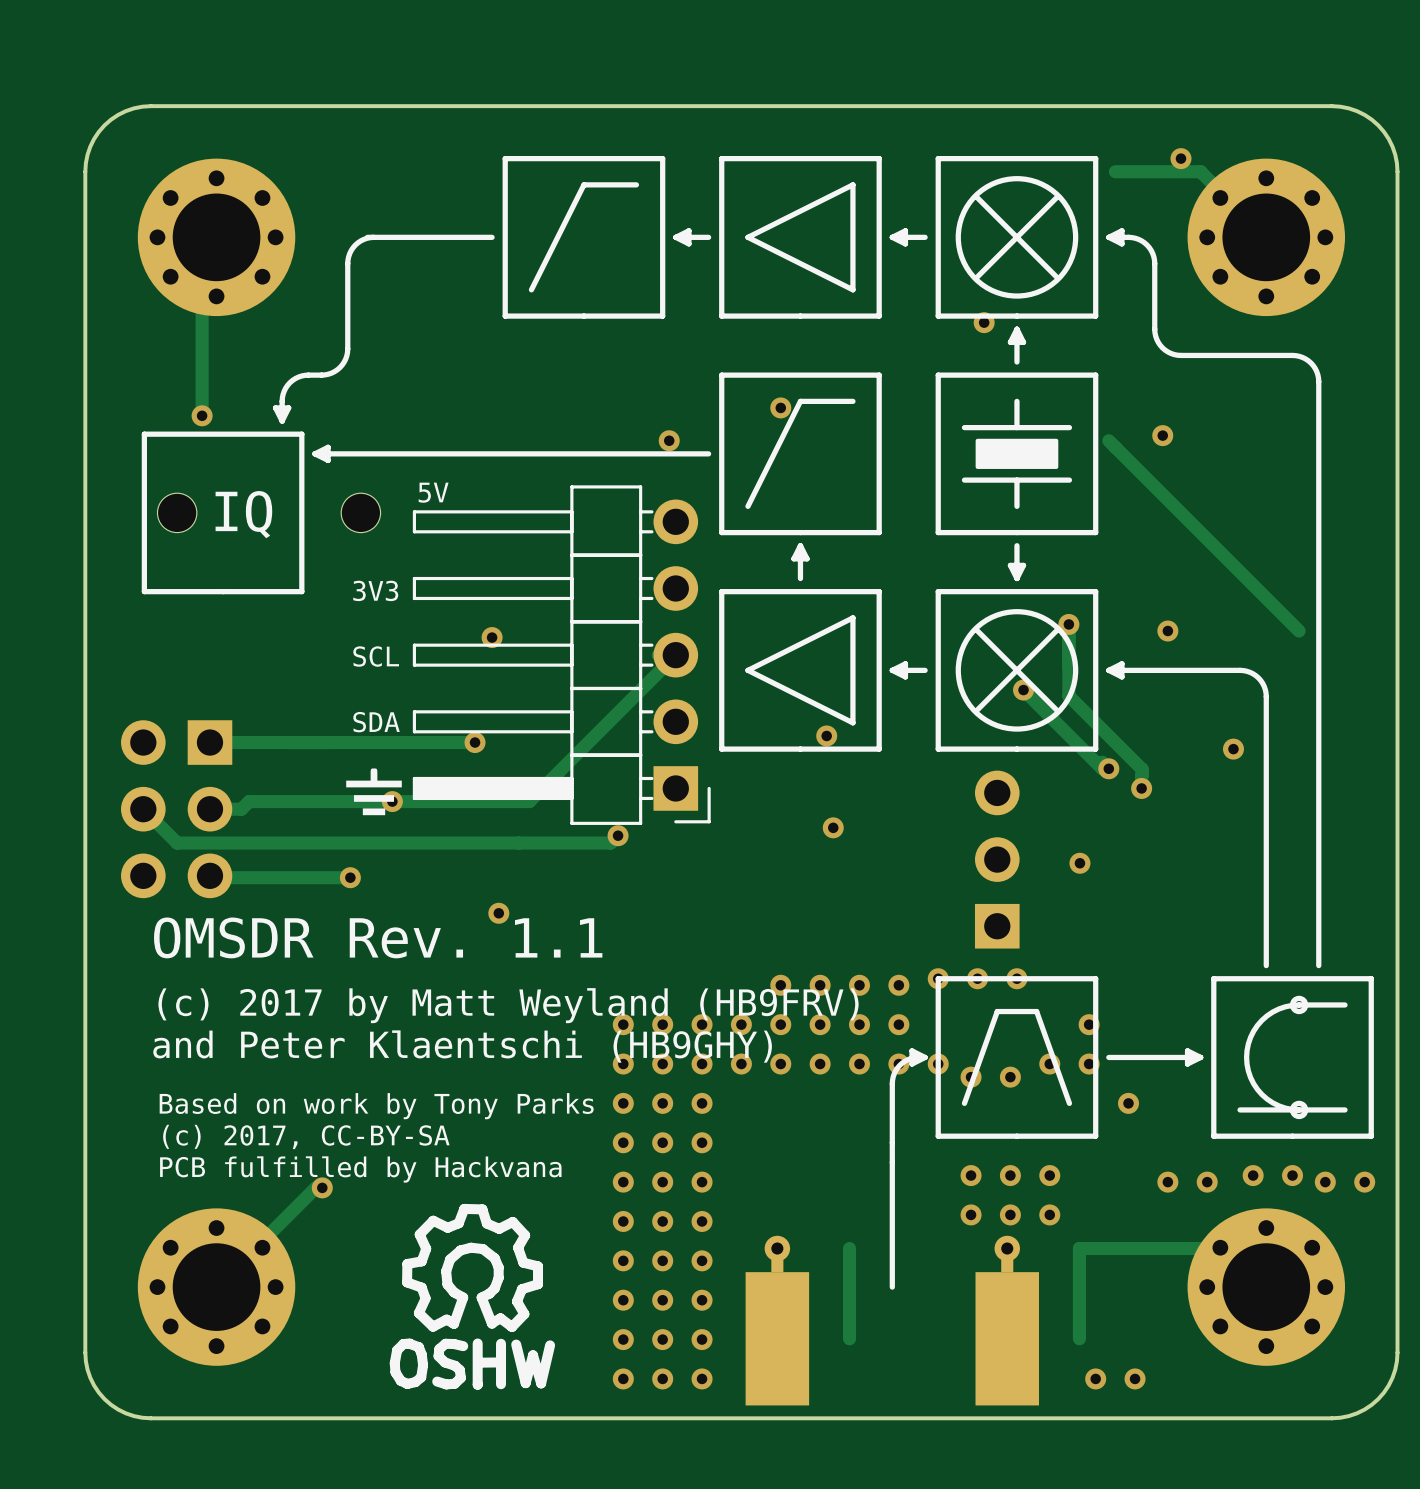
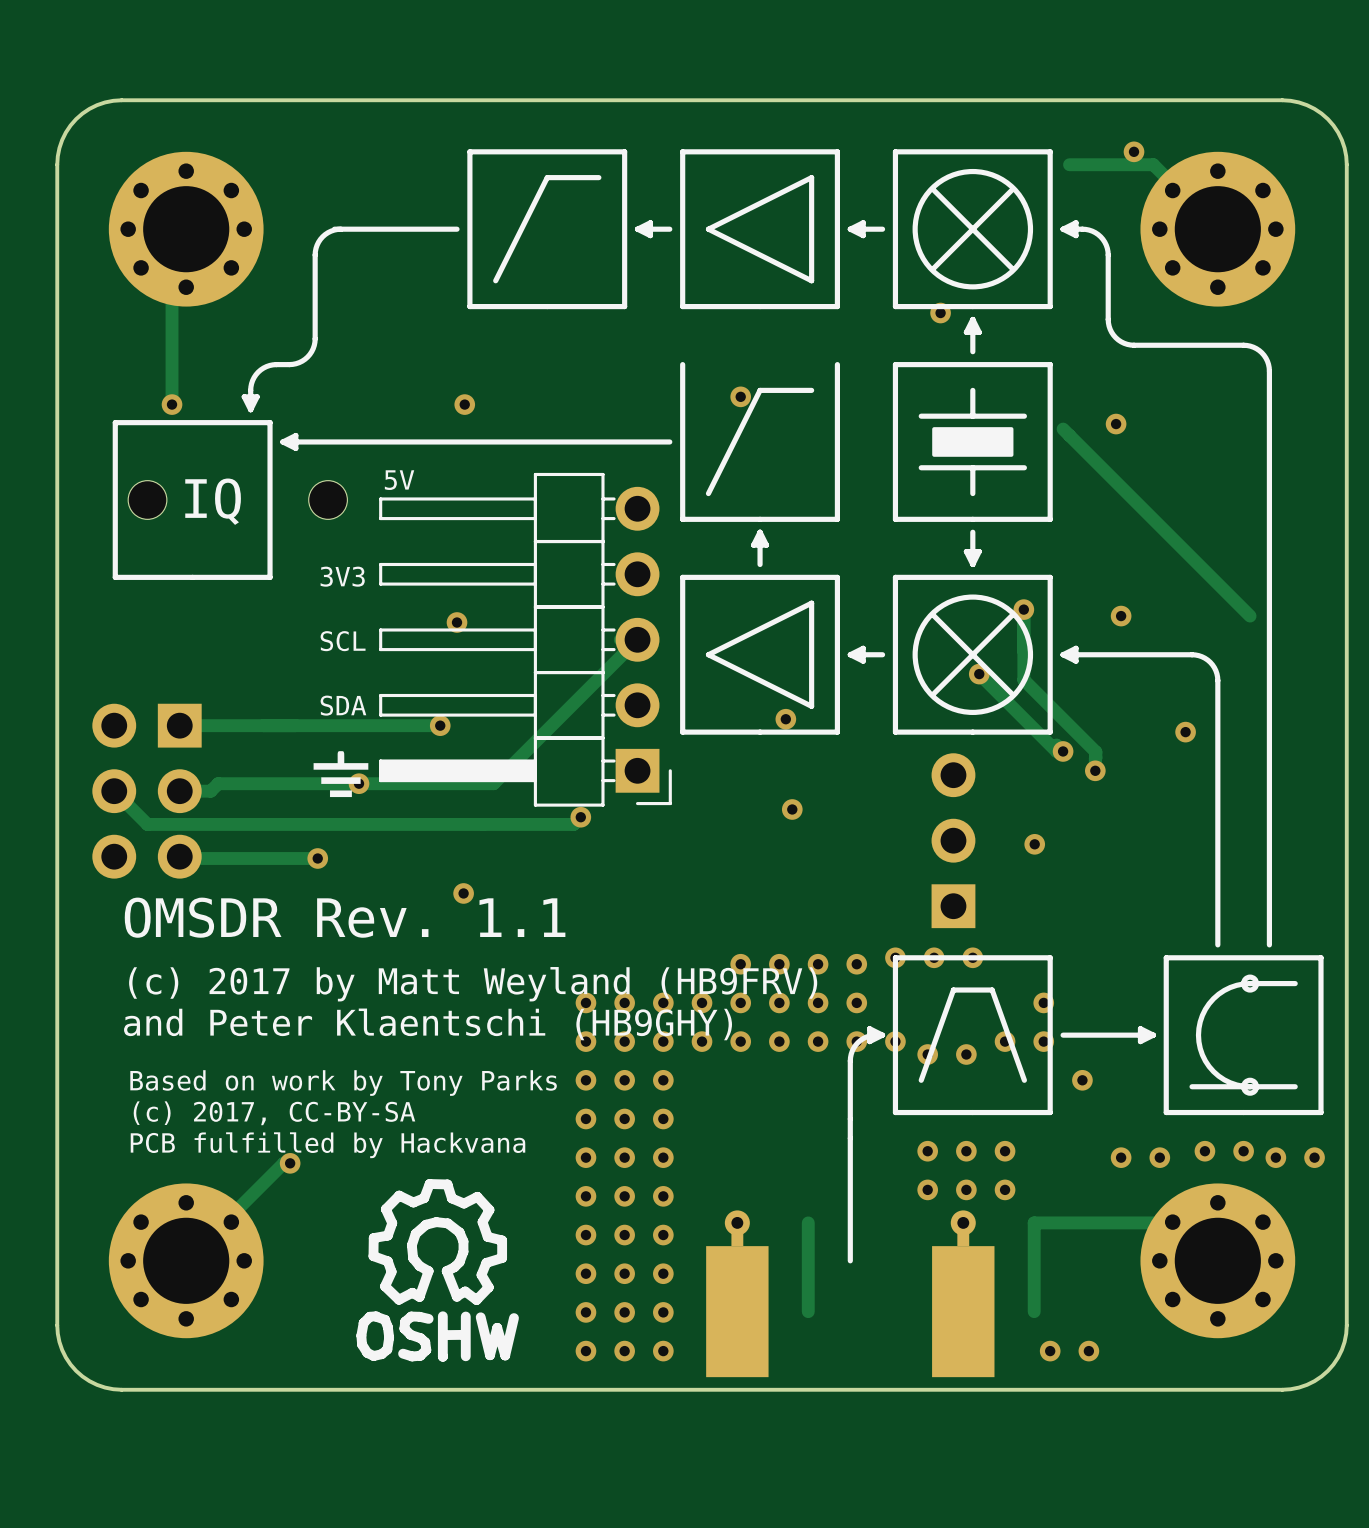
line: (879, 375) (721, 375) -> none
via: none -> (464, 404)
via: (669, 440) -> none

